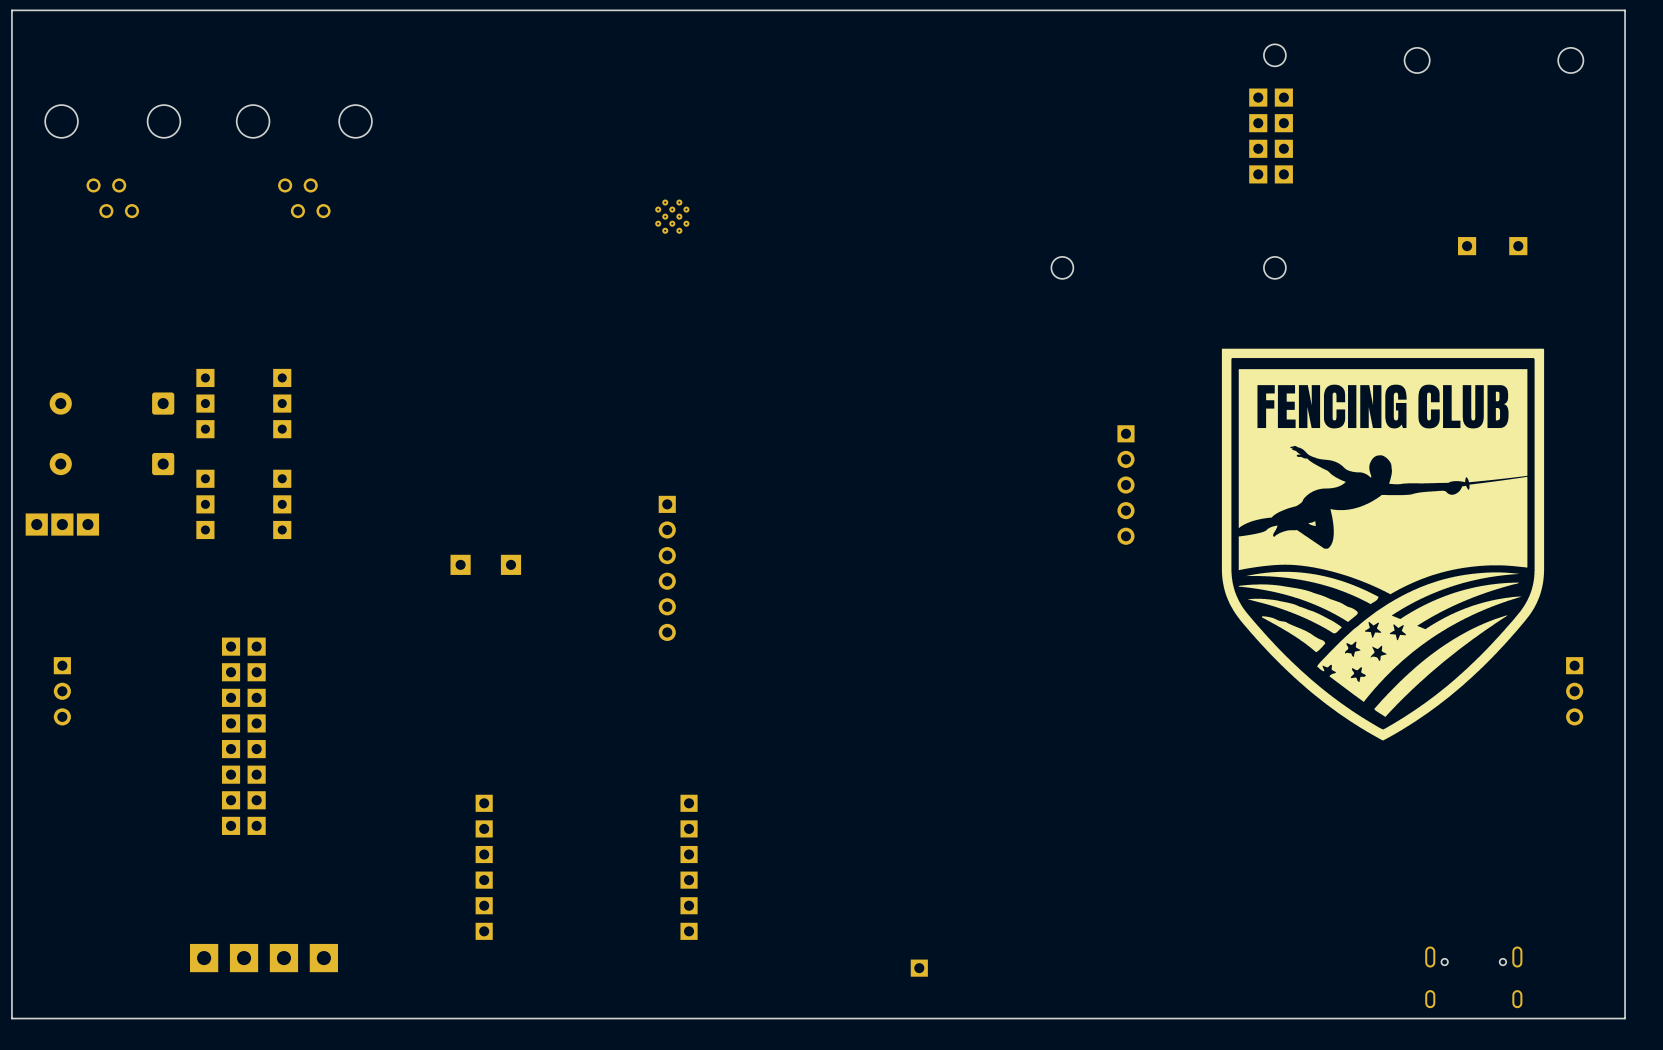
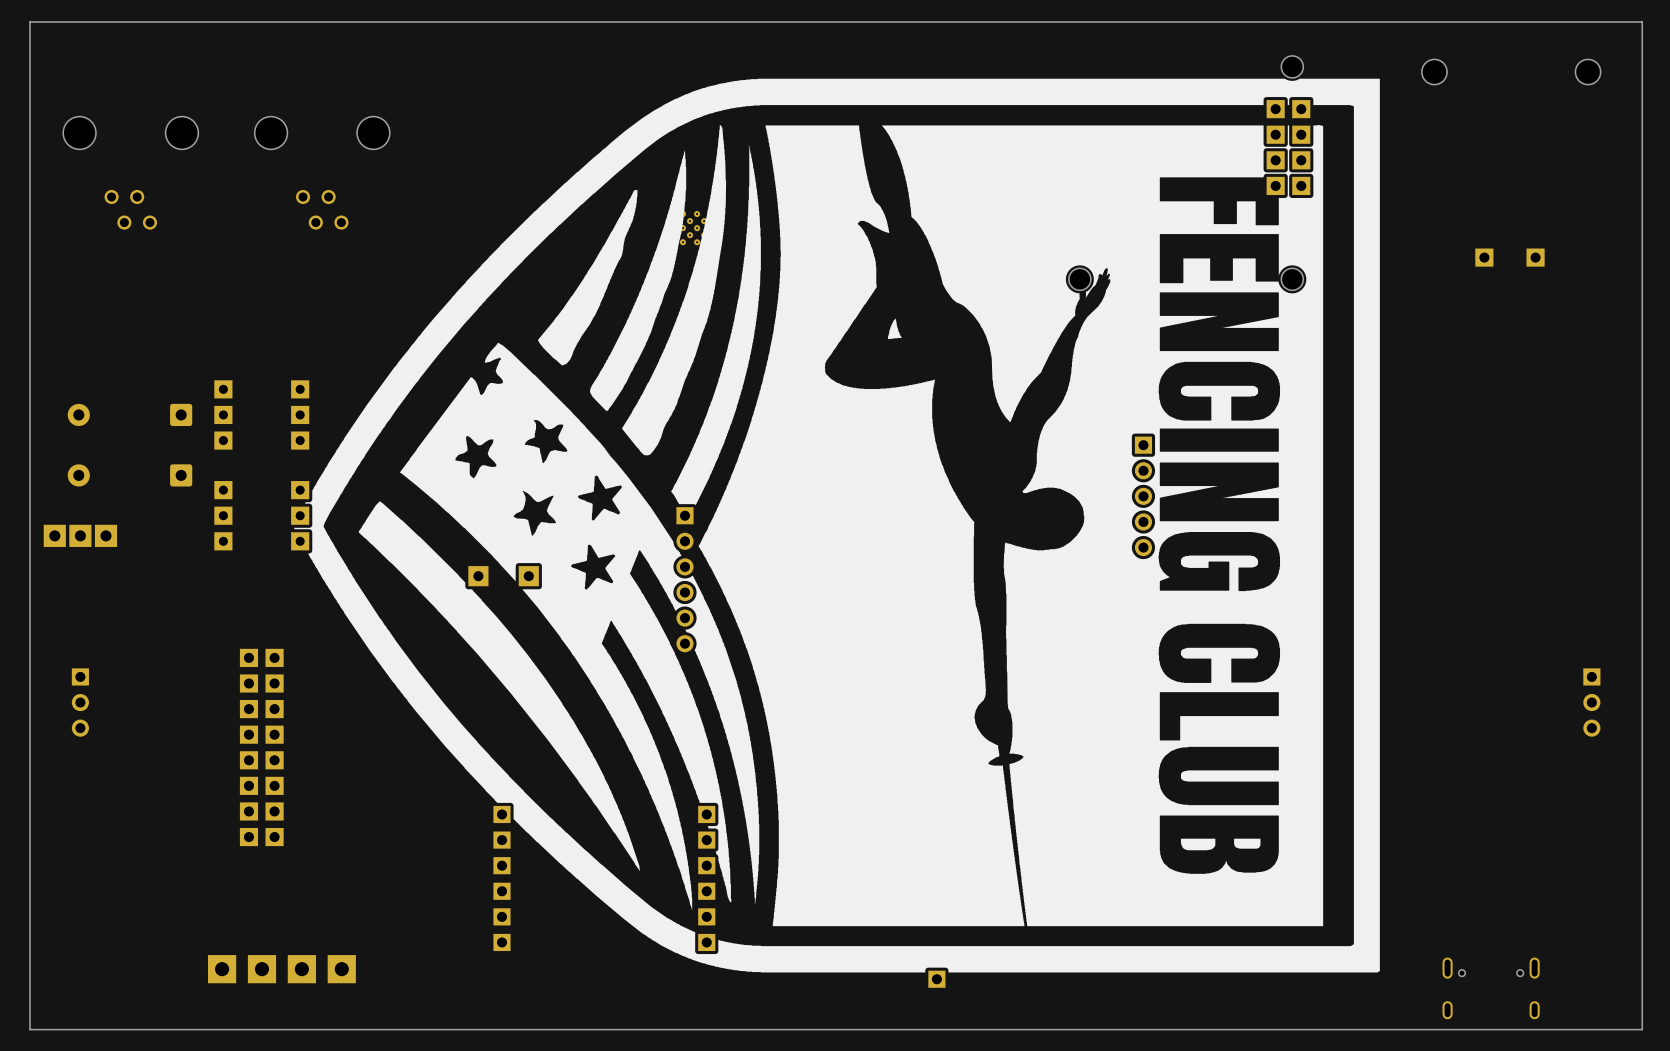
drawing: none -> [293, 78, 1380, 973]
drawing: [1221, 348, 1545, 741] -> none

